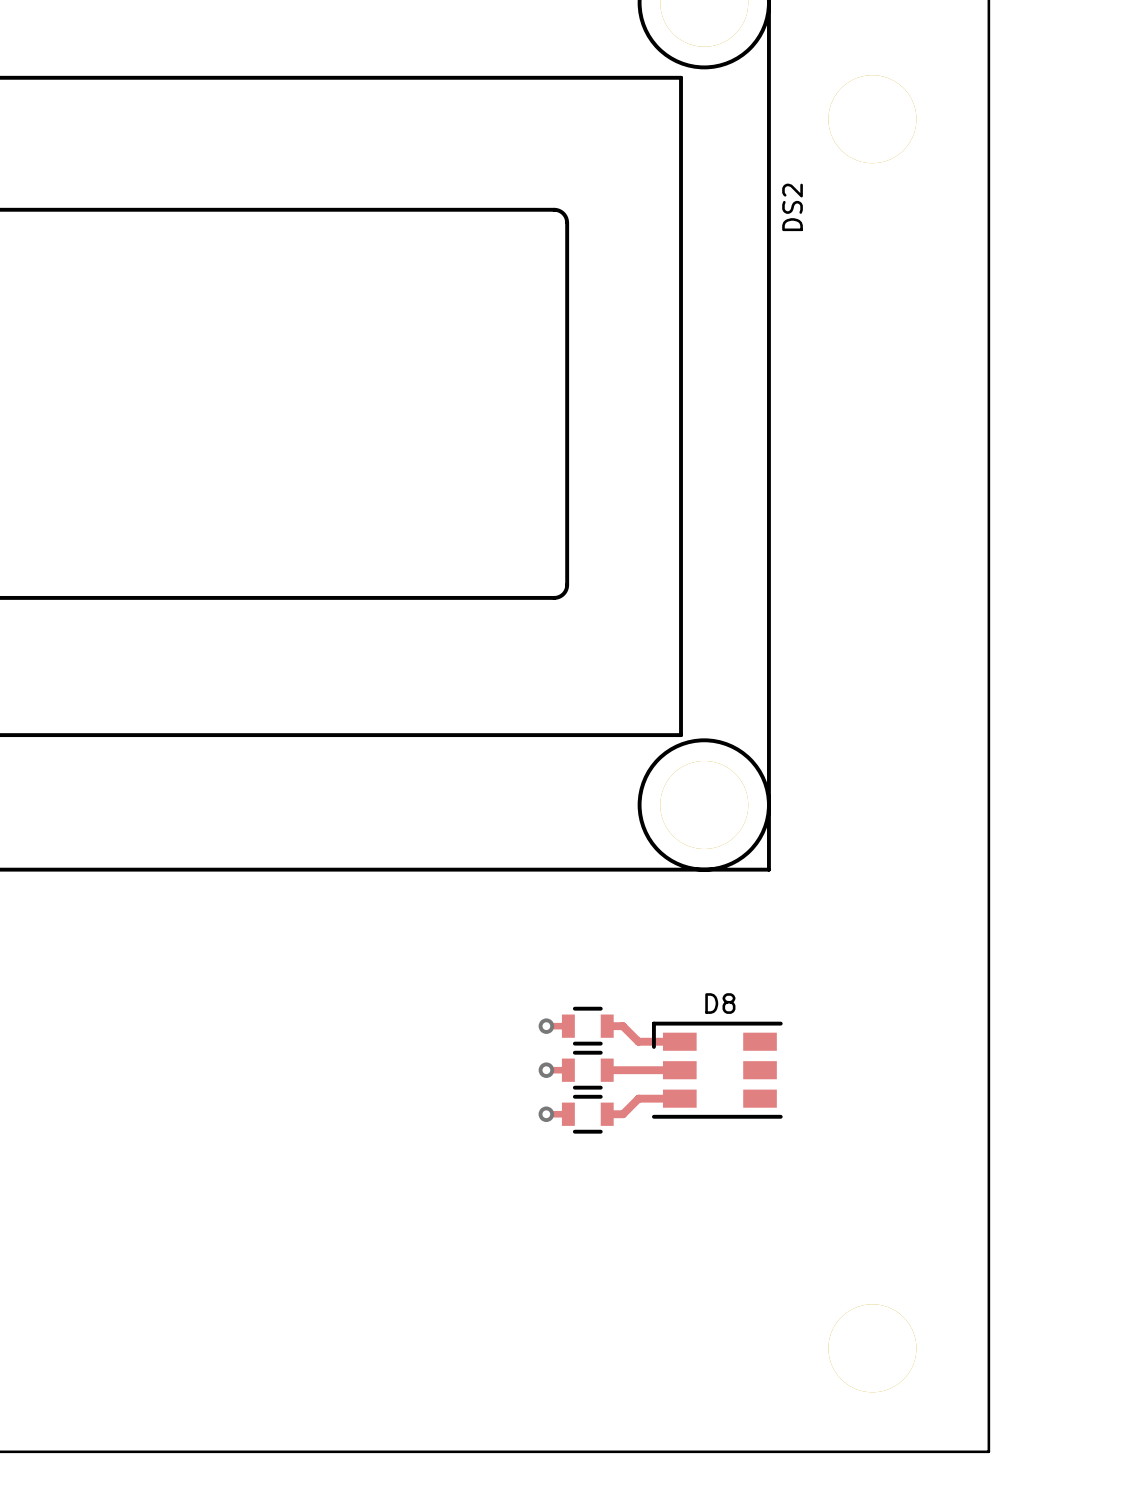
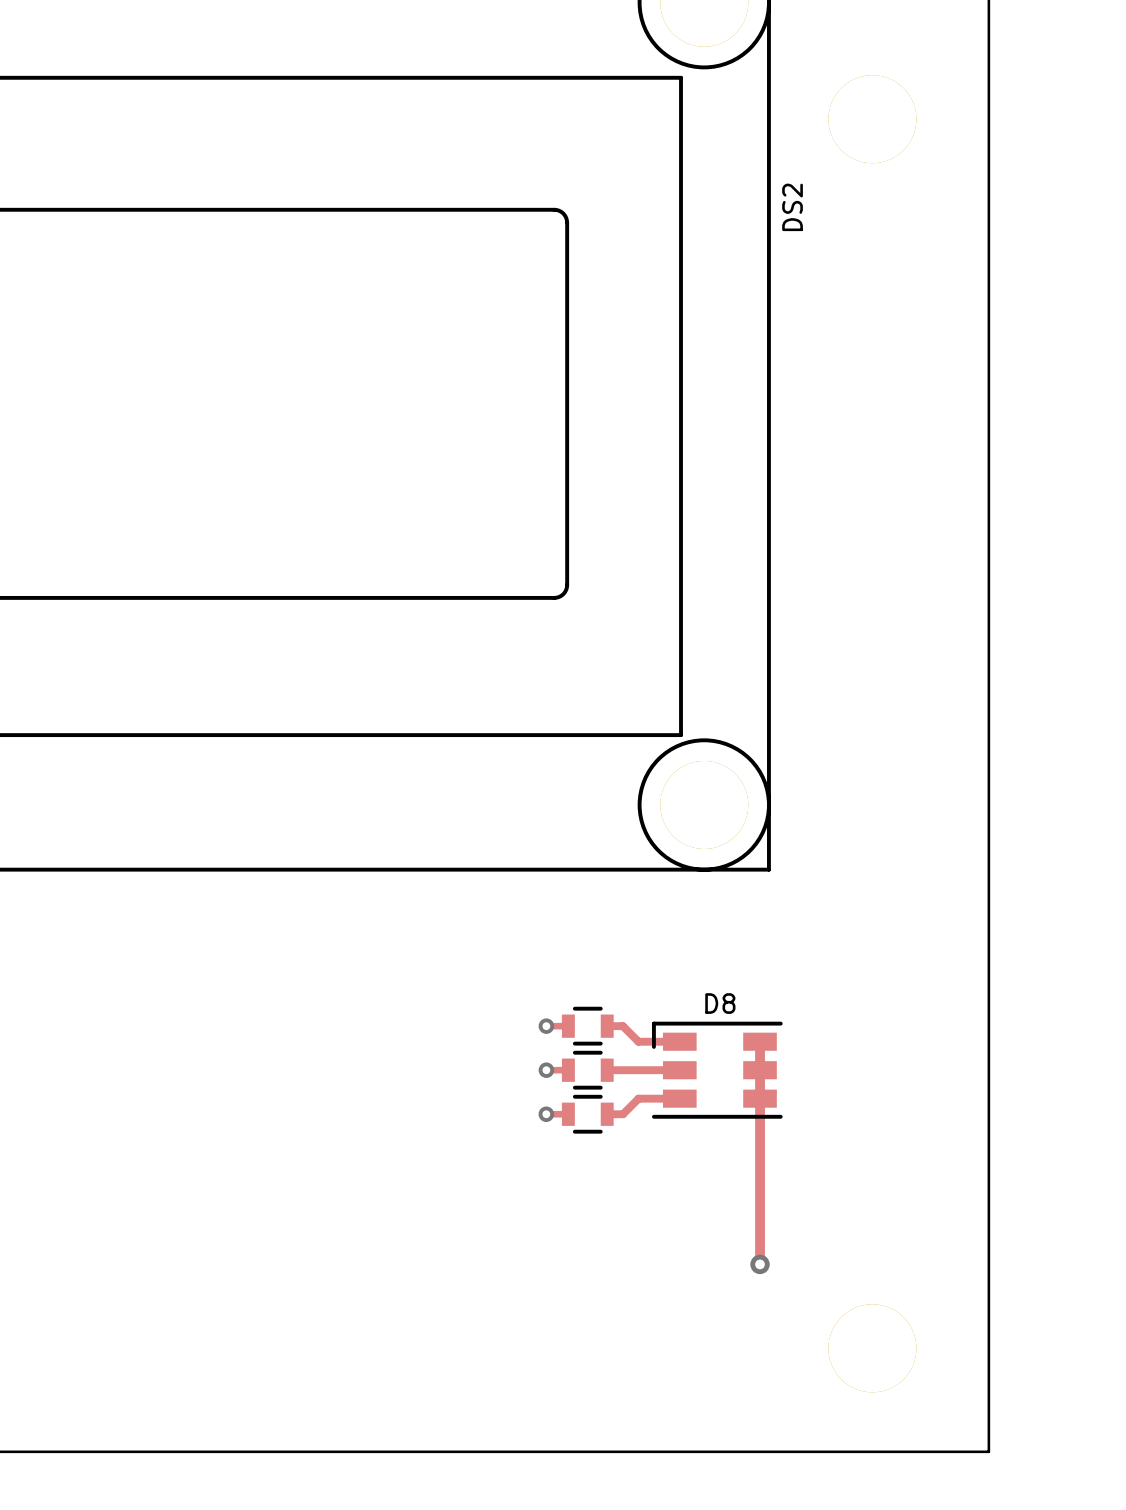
track: none -> (760, 1041) (760, 1264)
via: none -> (760, 1264)

